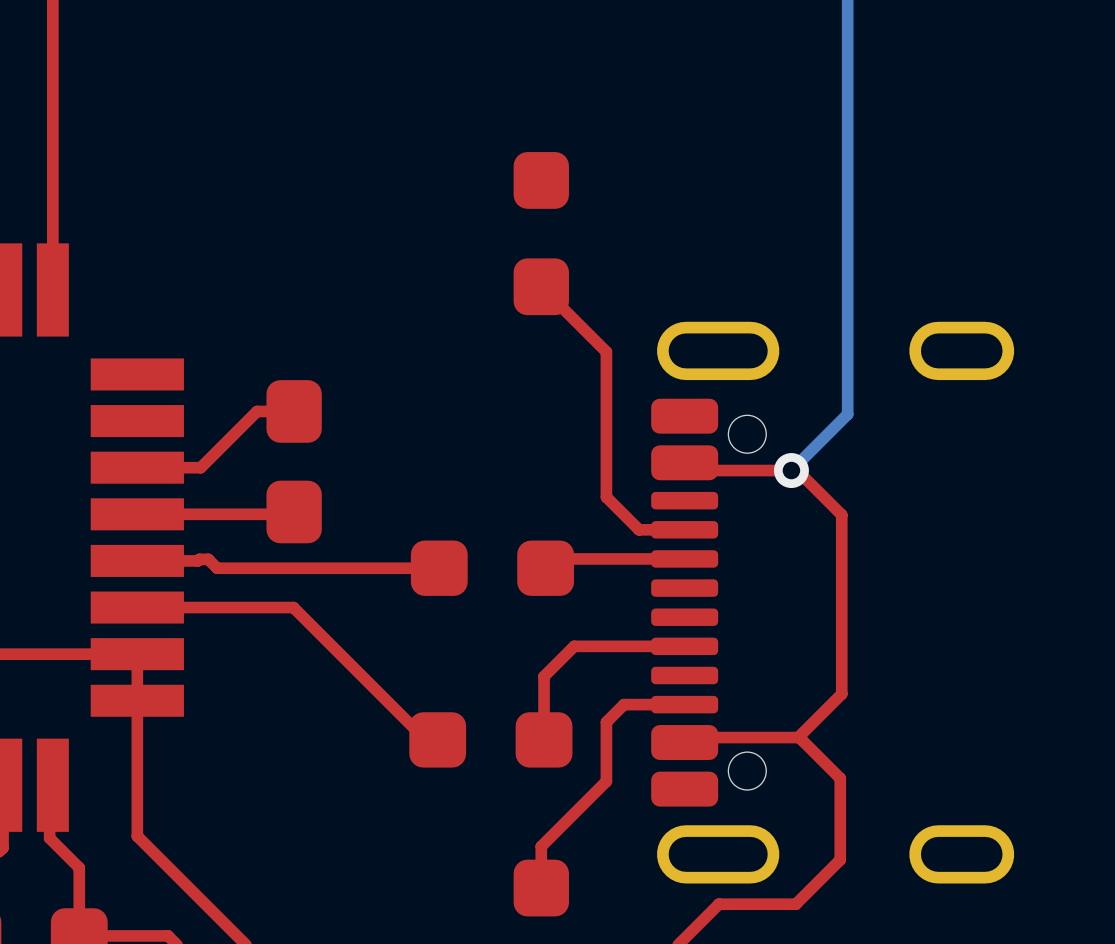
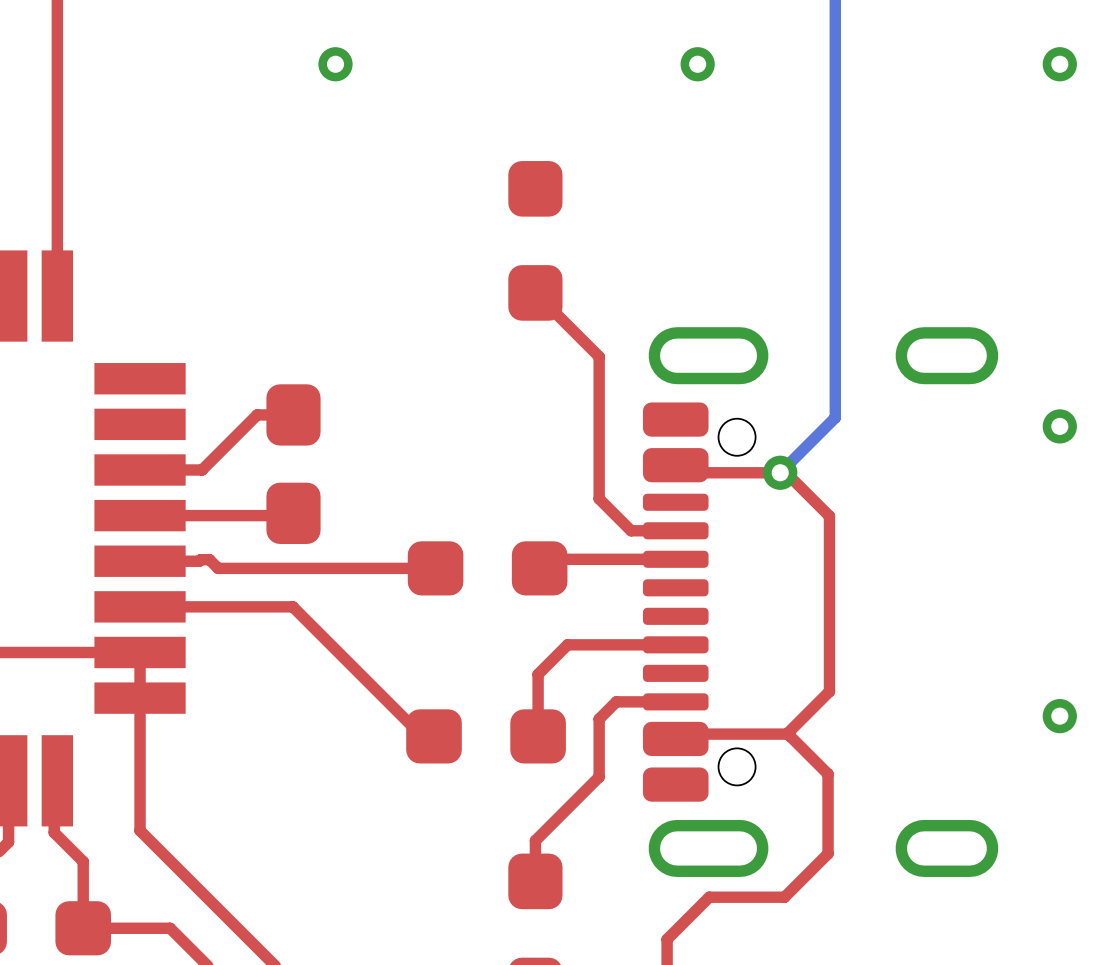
via: none -> (335, 64)
via: none -> (697, 64)
via: none -> (1059, 64)
via: none -> (1059, 426)
via: none -> (1059, 716)

